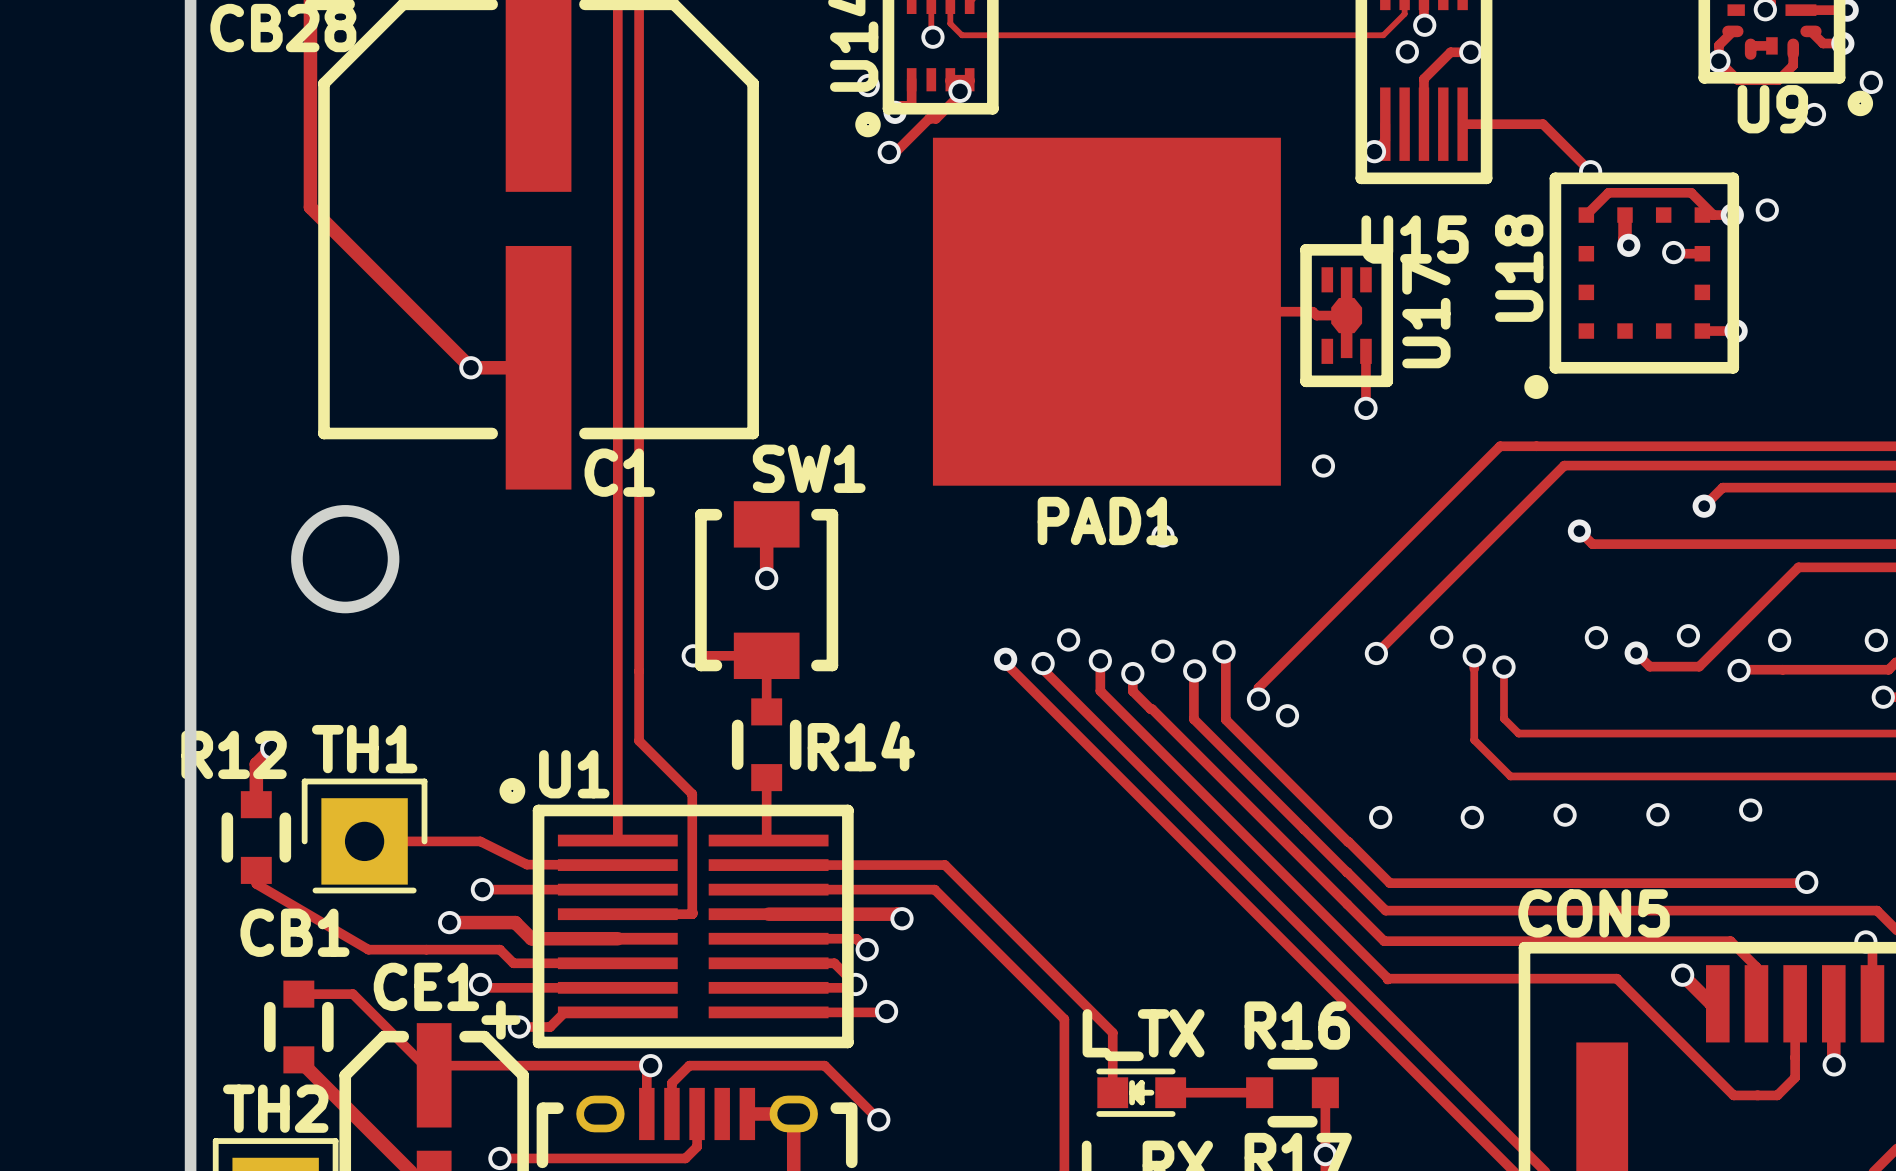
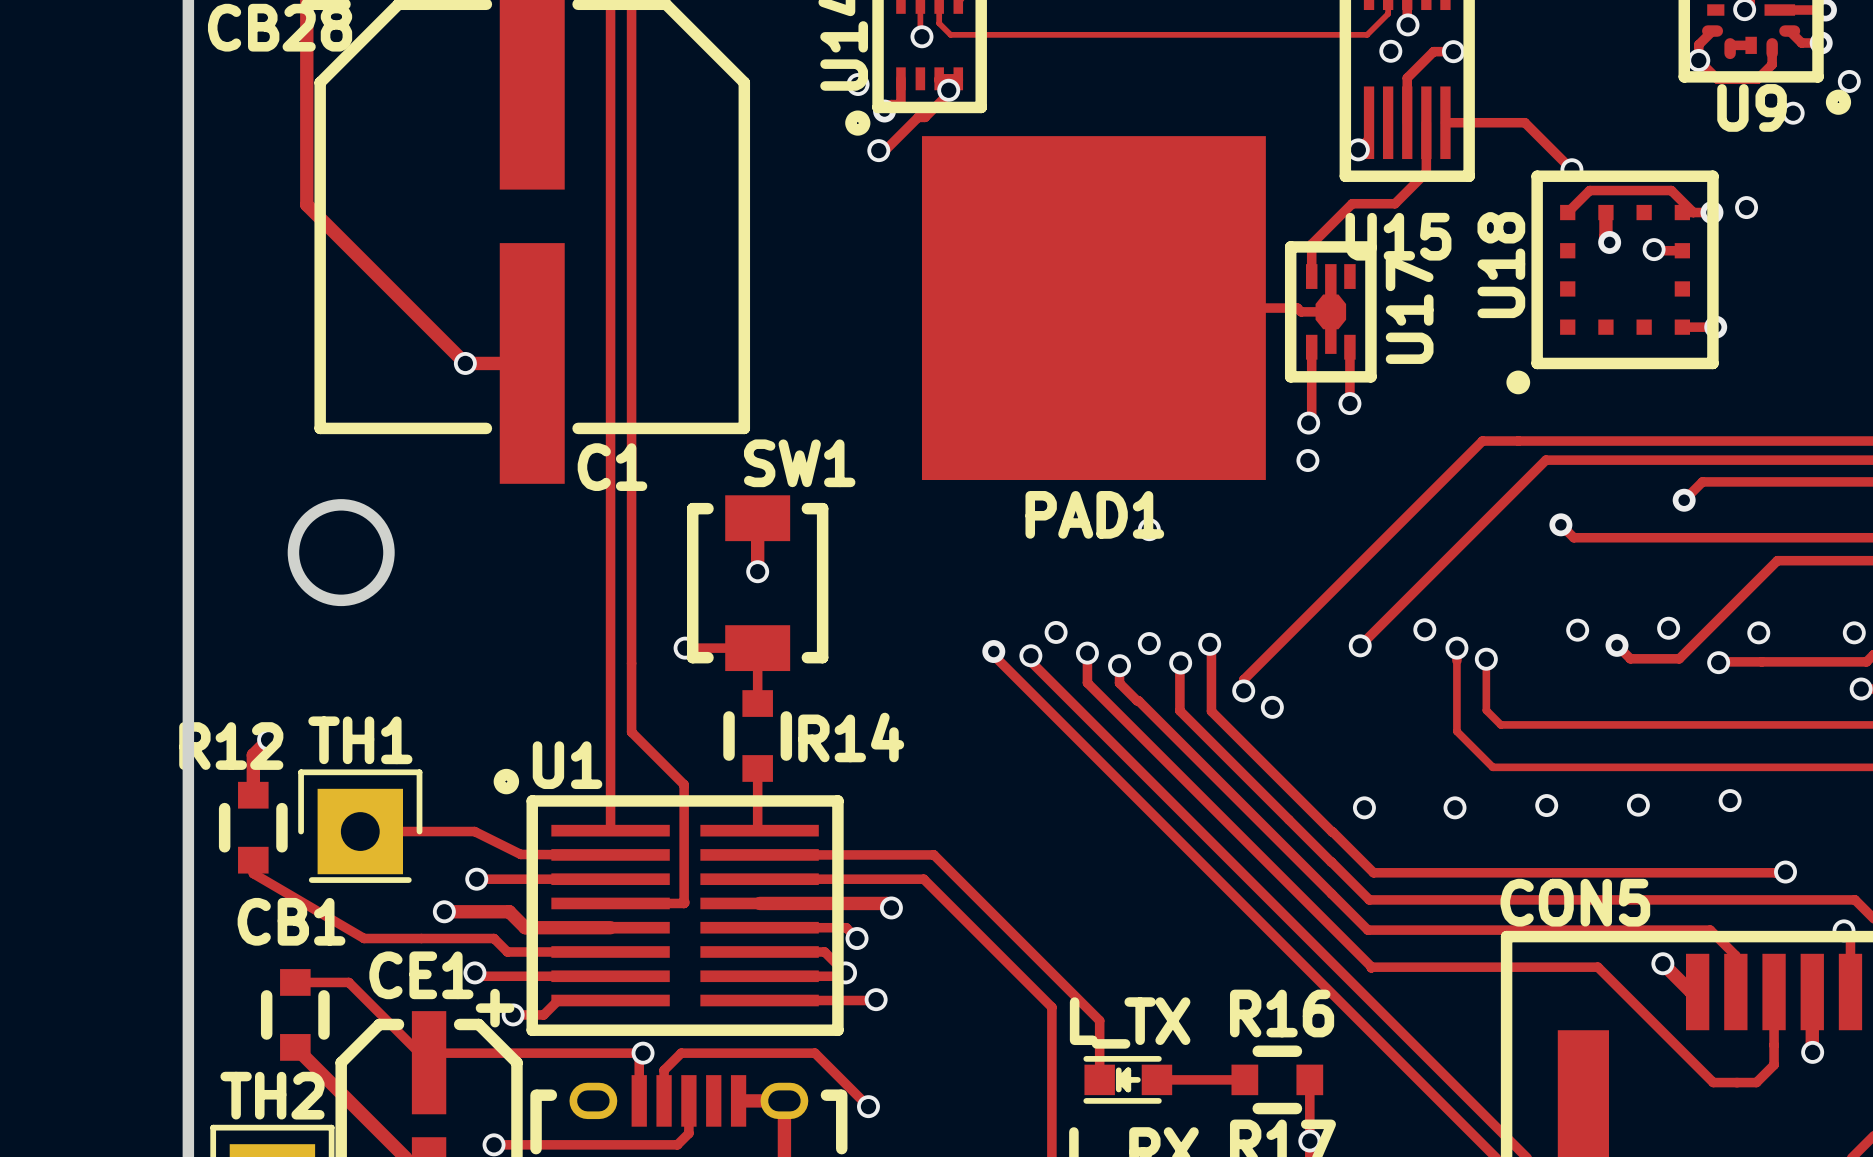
track: none -> (1426, 122) (1426, 172) (1395, 203) (1352, 203) (1311, 244) (1311, 276)
track: none -> (1311, 347) (1311, 420) (1308, 423)
via: none -> (1308, 423)

